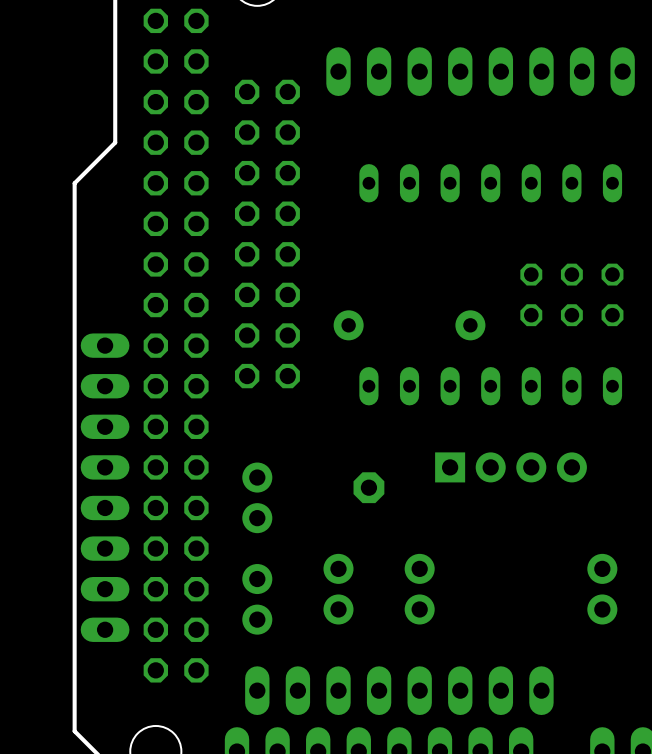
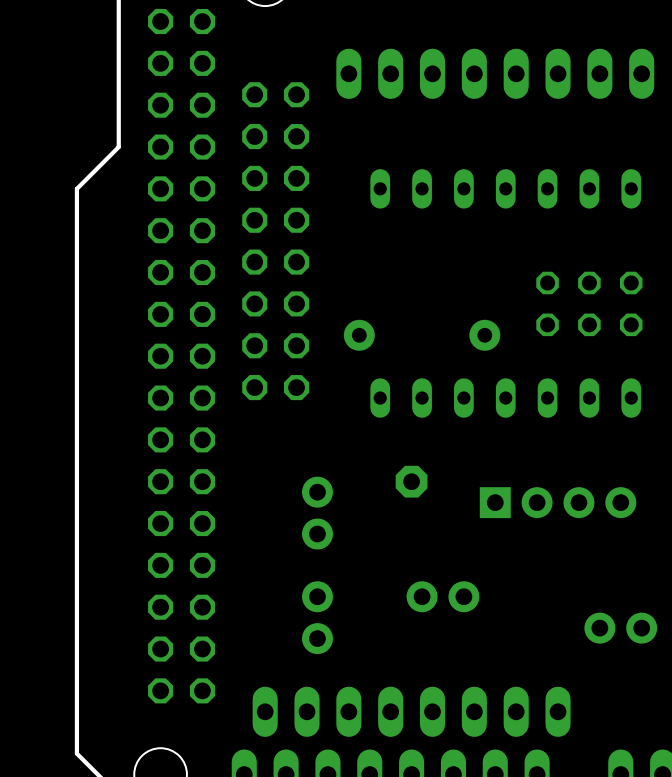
part position: (511, 467) -> (558, 502)
part: (105, 487) -> none
part position: (368, 487) -> (411, 481)
part: (257, 497) -> none
part: none -> (317, 513)
part: (338, 589) -> none
part rotation: 0° (419, 589) -> 90° clockwise (442, 596)
part rotation: 0° (602, 589) -> 90° clockwise (620, 628)
part: (257, 599) -> none
part: none -> (317, 617)

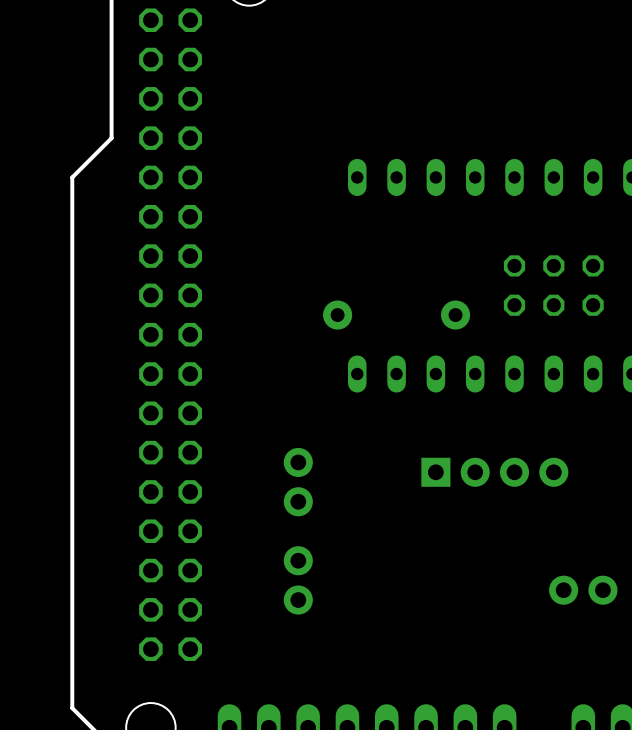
part: (495, 73) -> none
part: (275, 241) -> none
part: (411, 481) -> none
part position: (558, 502) -> (494, 472)
part: (442, 596) -> none
part: (411, 711) -> none

